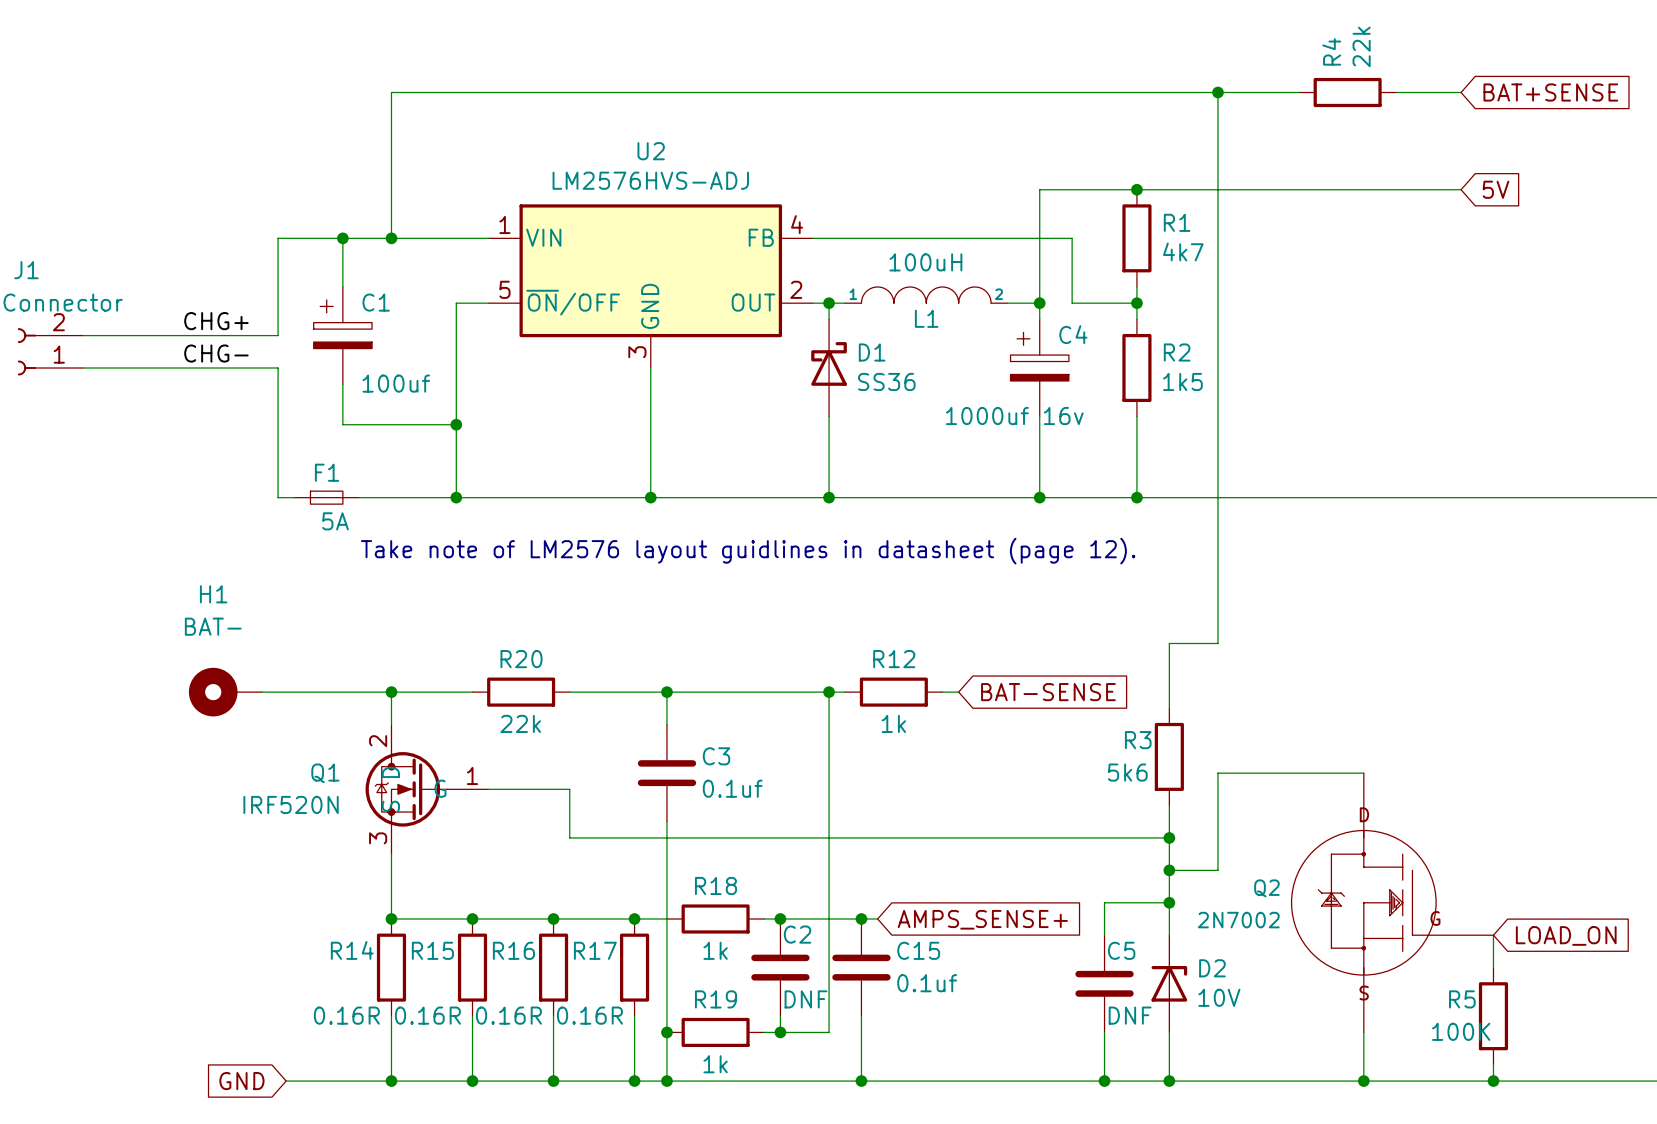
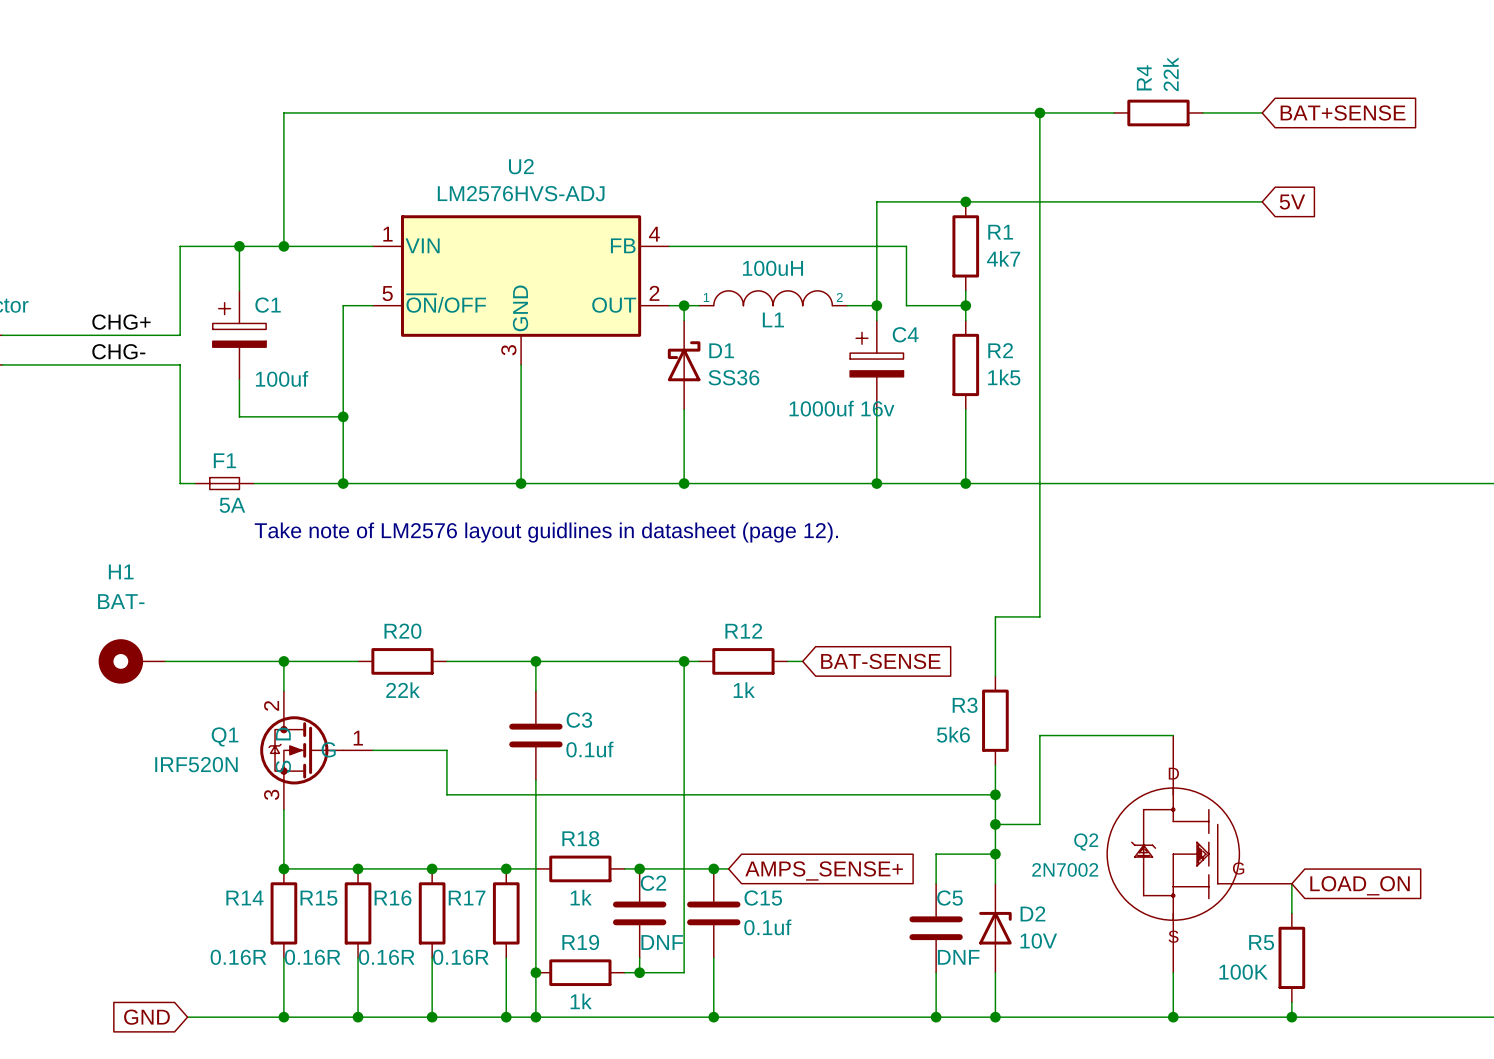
R5 value position: 100K (1461, 1031) -> 100K (1243, 972)

